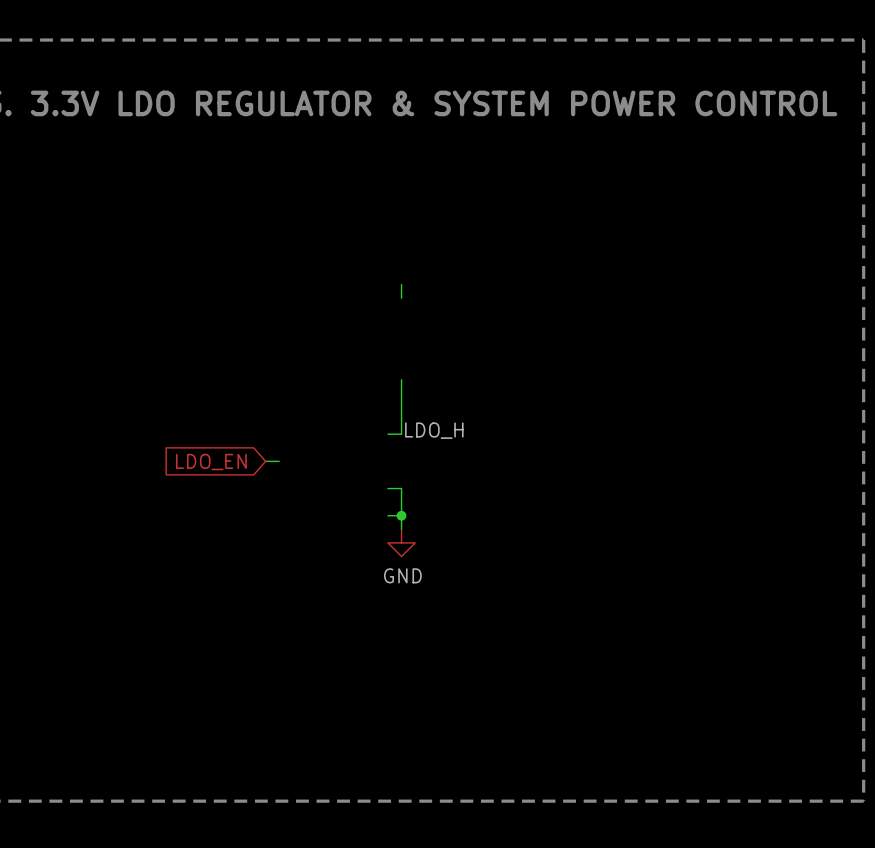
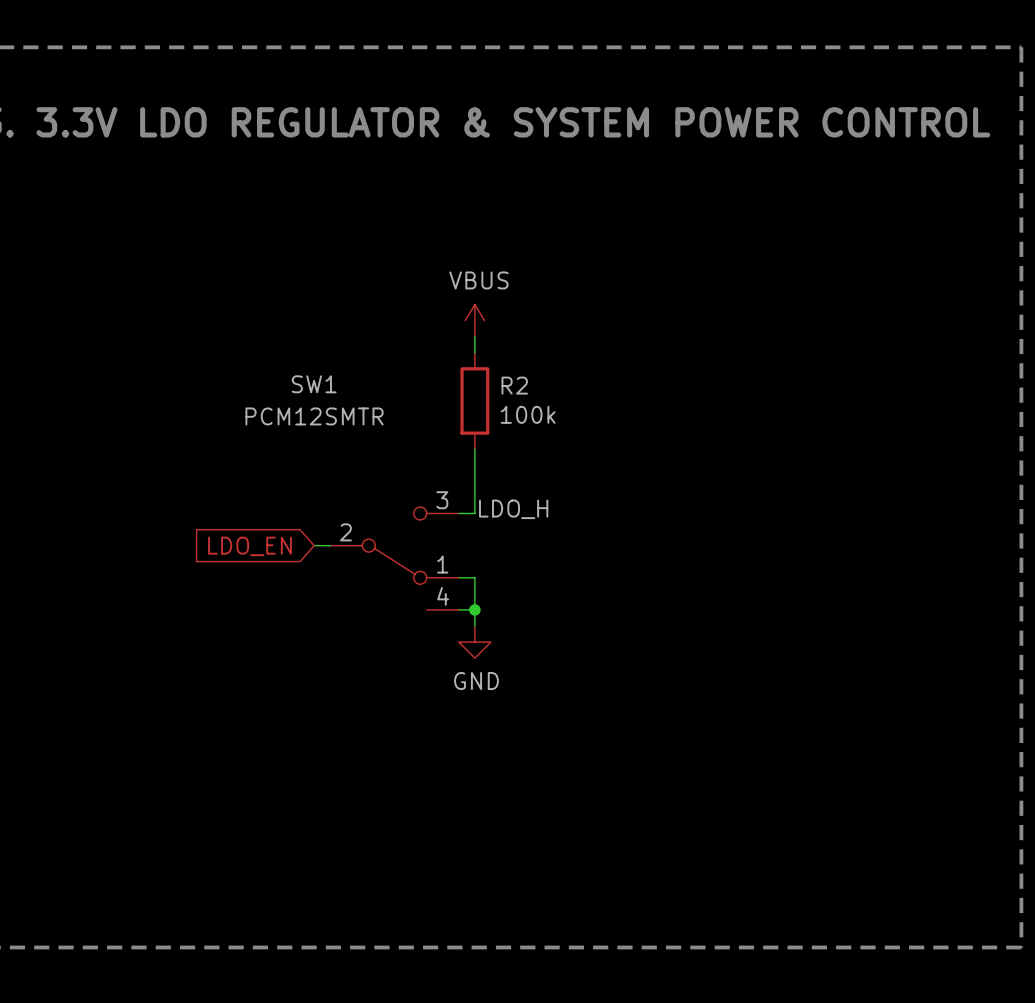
power symbol: none -> VBUS (474, 320)
R2: none -> 100k (474, 400)
SW1: none -> PCM12SMTR (394, 558)

